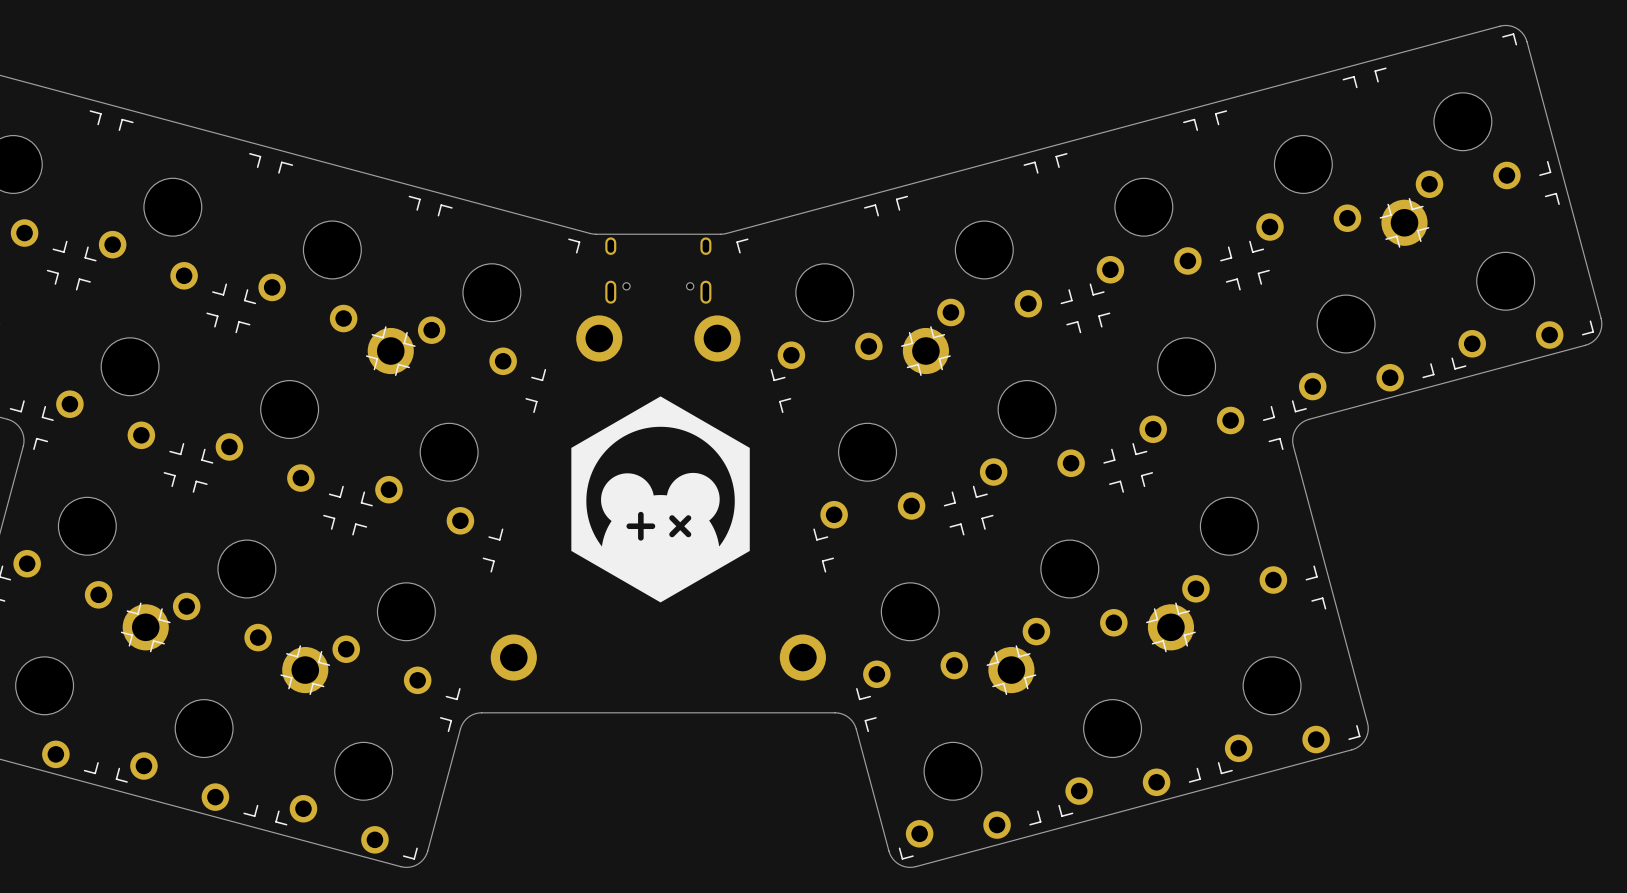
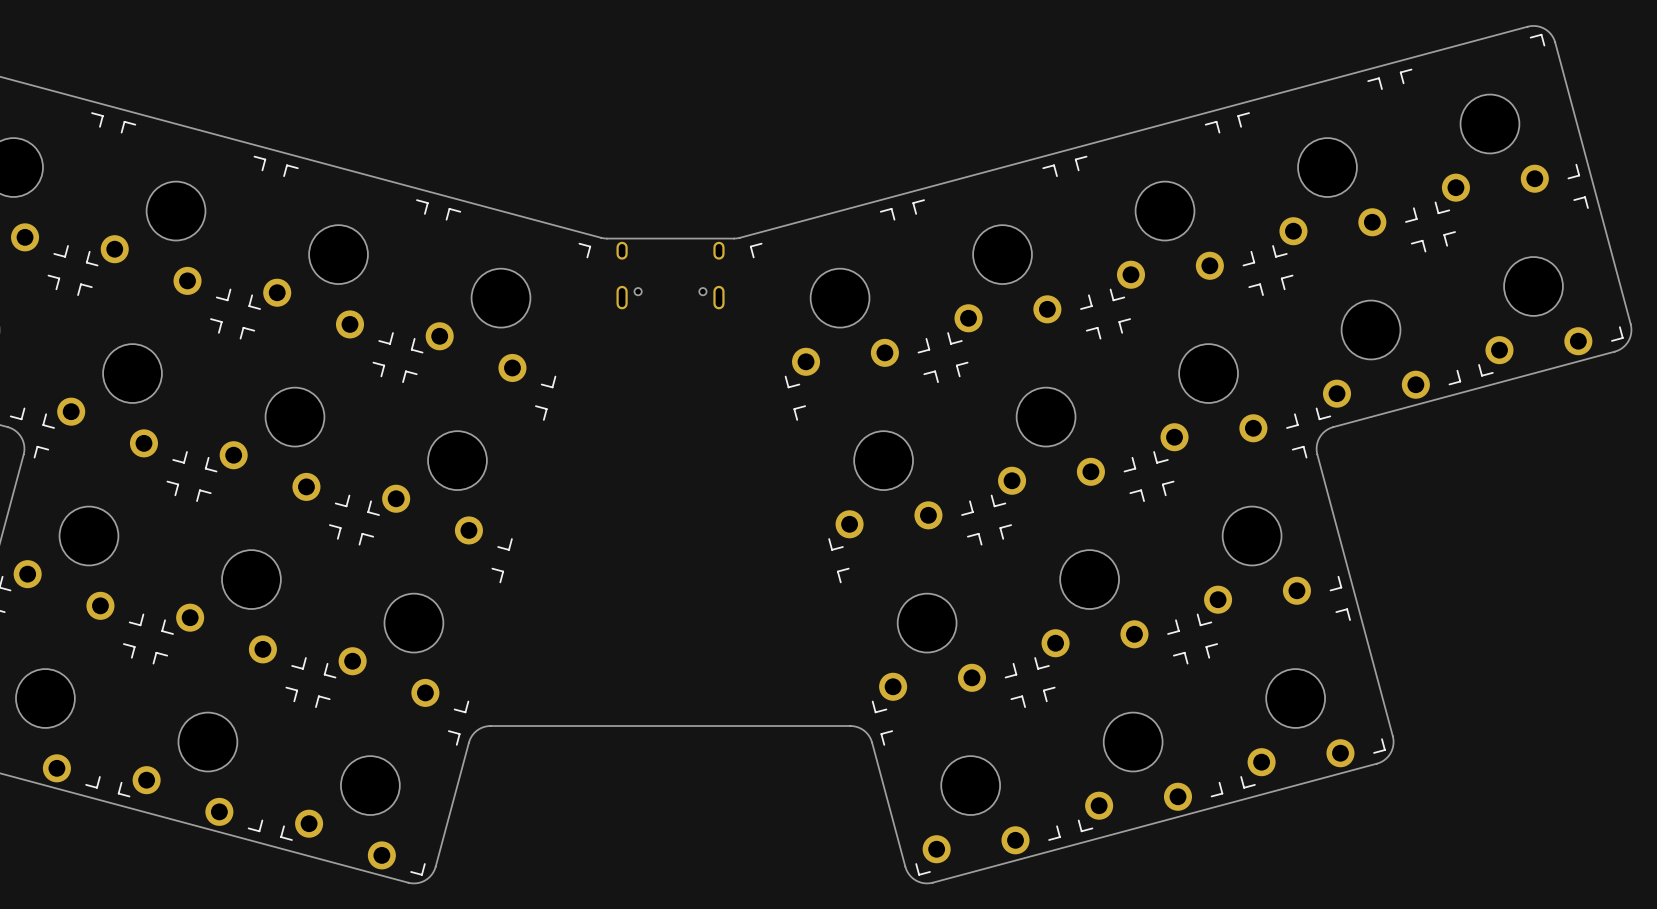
part: (1404, 222) -> none
part: (599, 338) -> none
part: (717, 338) -> none
part: (390, 351) -> none
part: (925, 351) -> none
drawing: [571, 396, 750, 603] -> none
part: (145, 627) -> none
part: (1170, 627) -> none
part: (513, 657) -> none
part: (802, 657) -> none
part: (305, 670) -> none
part: (1011, 670) -> none

